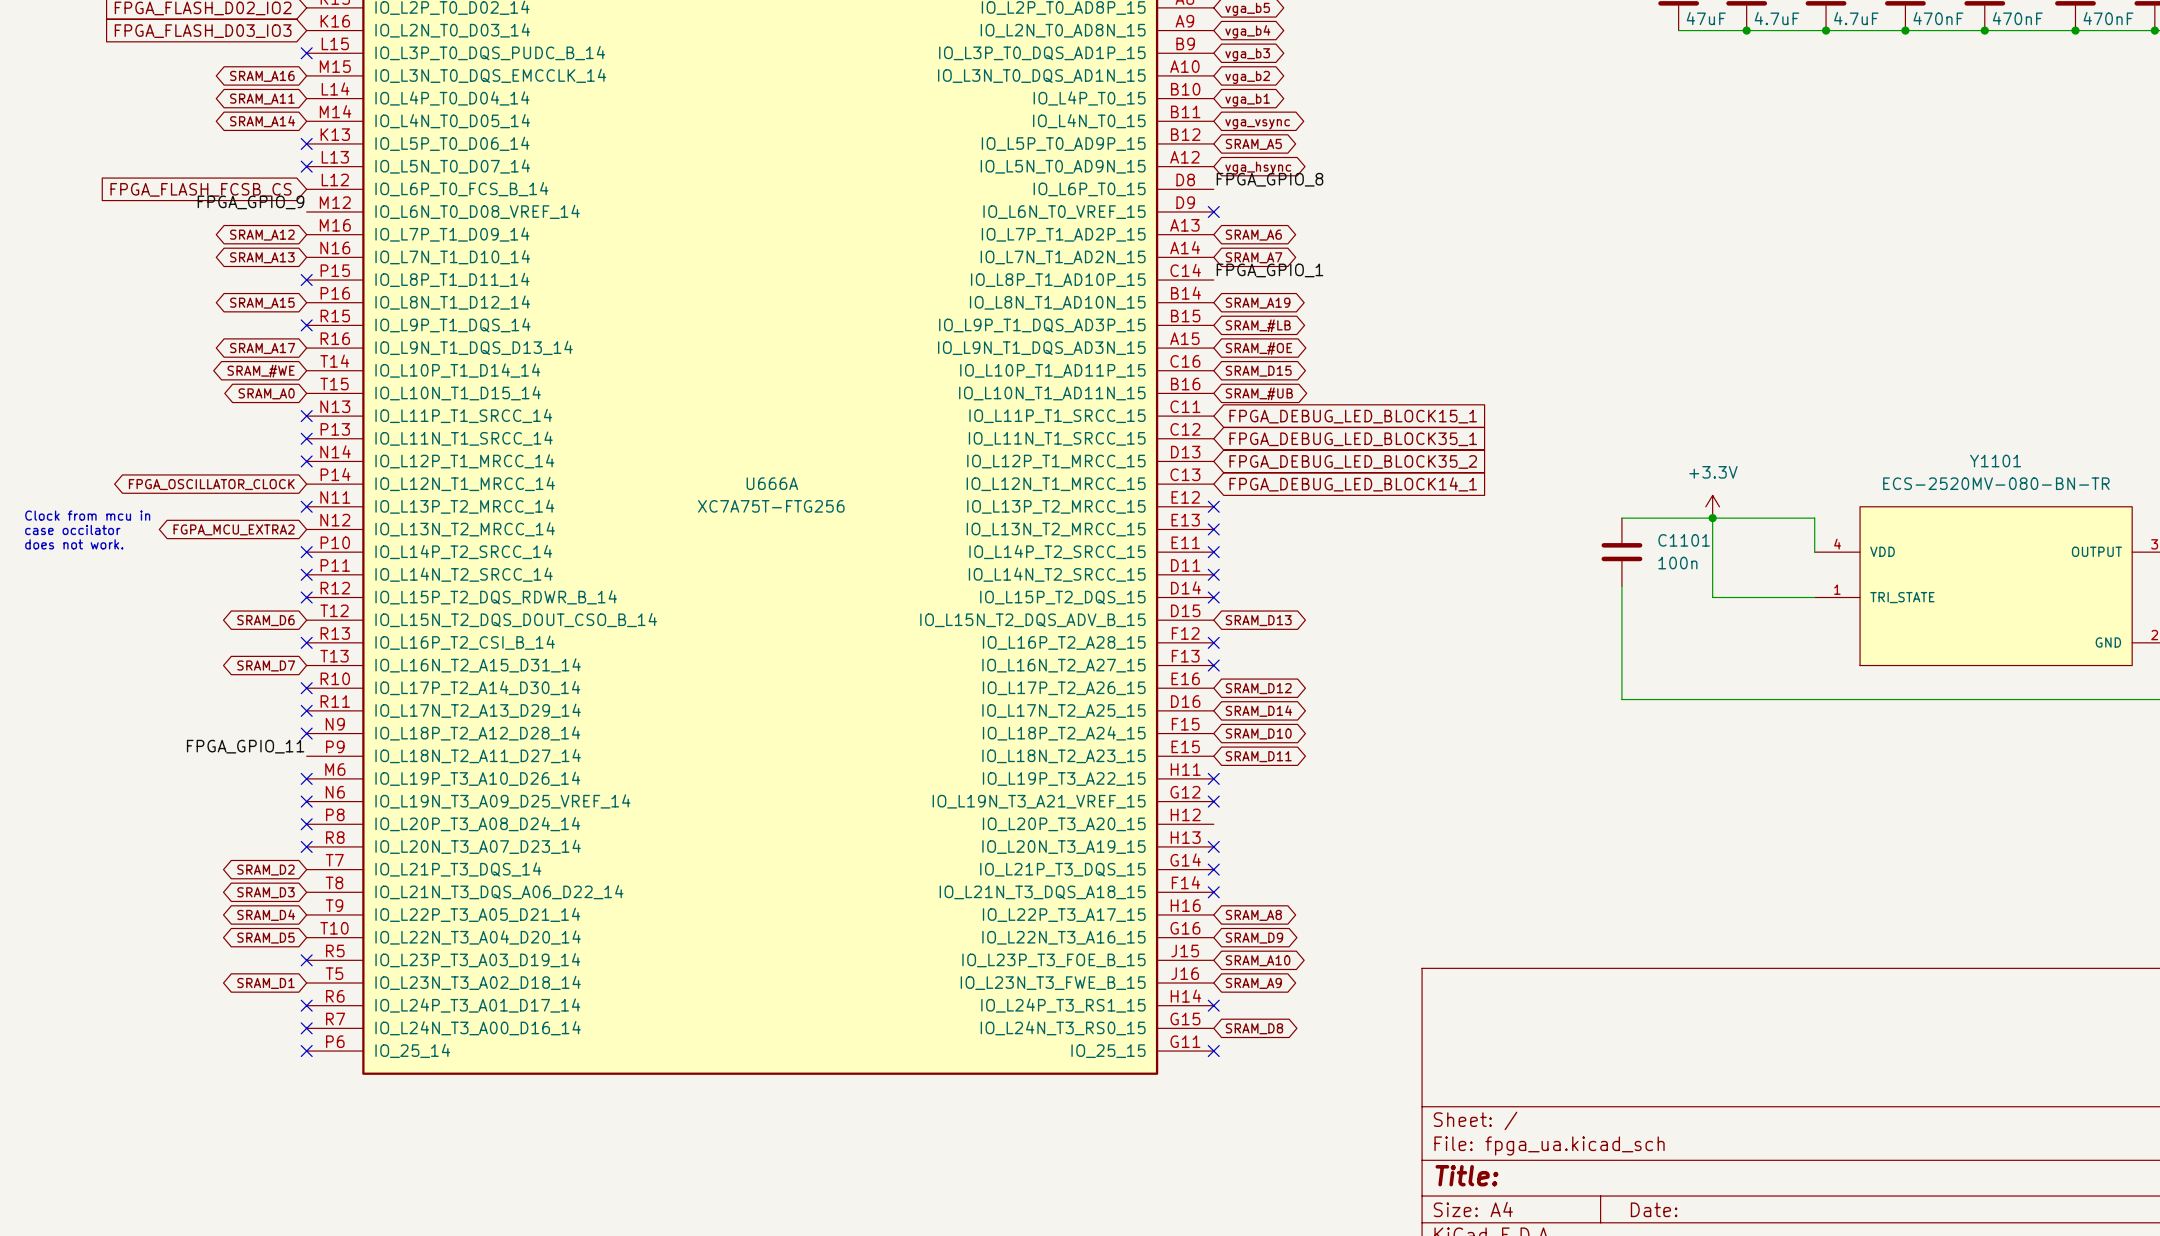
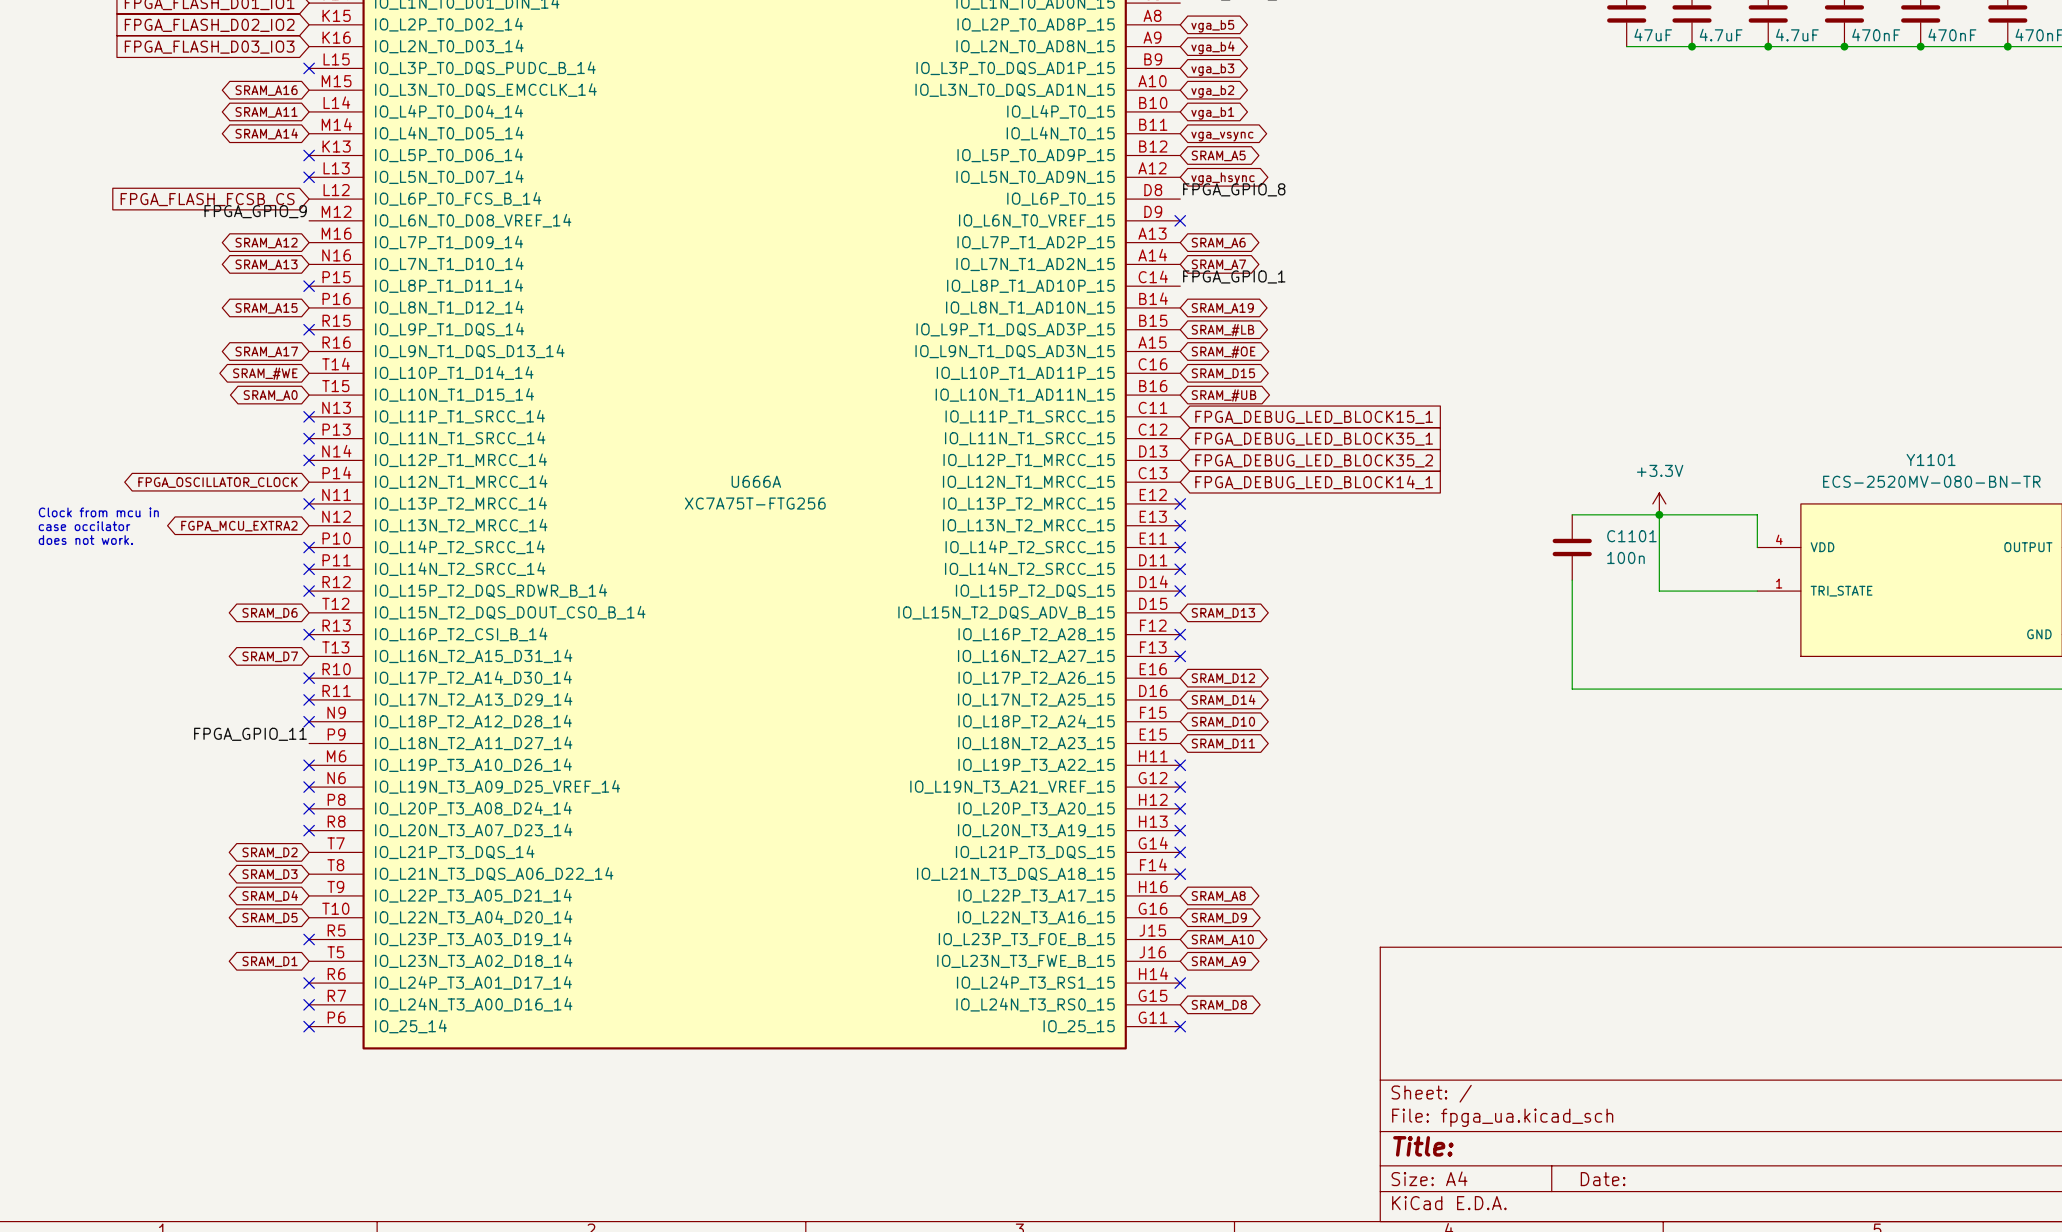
no-connect mark: none -> (1180, 808)

